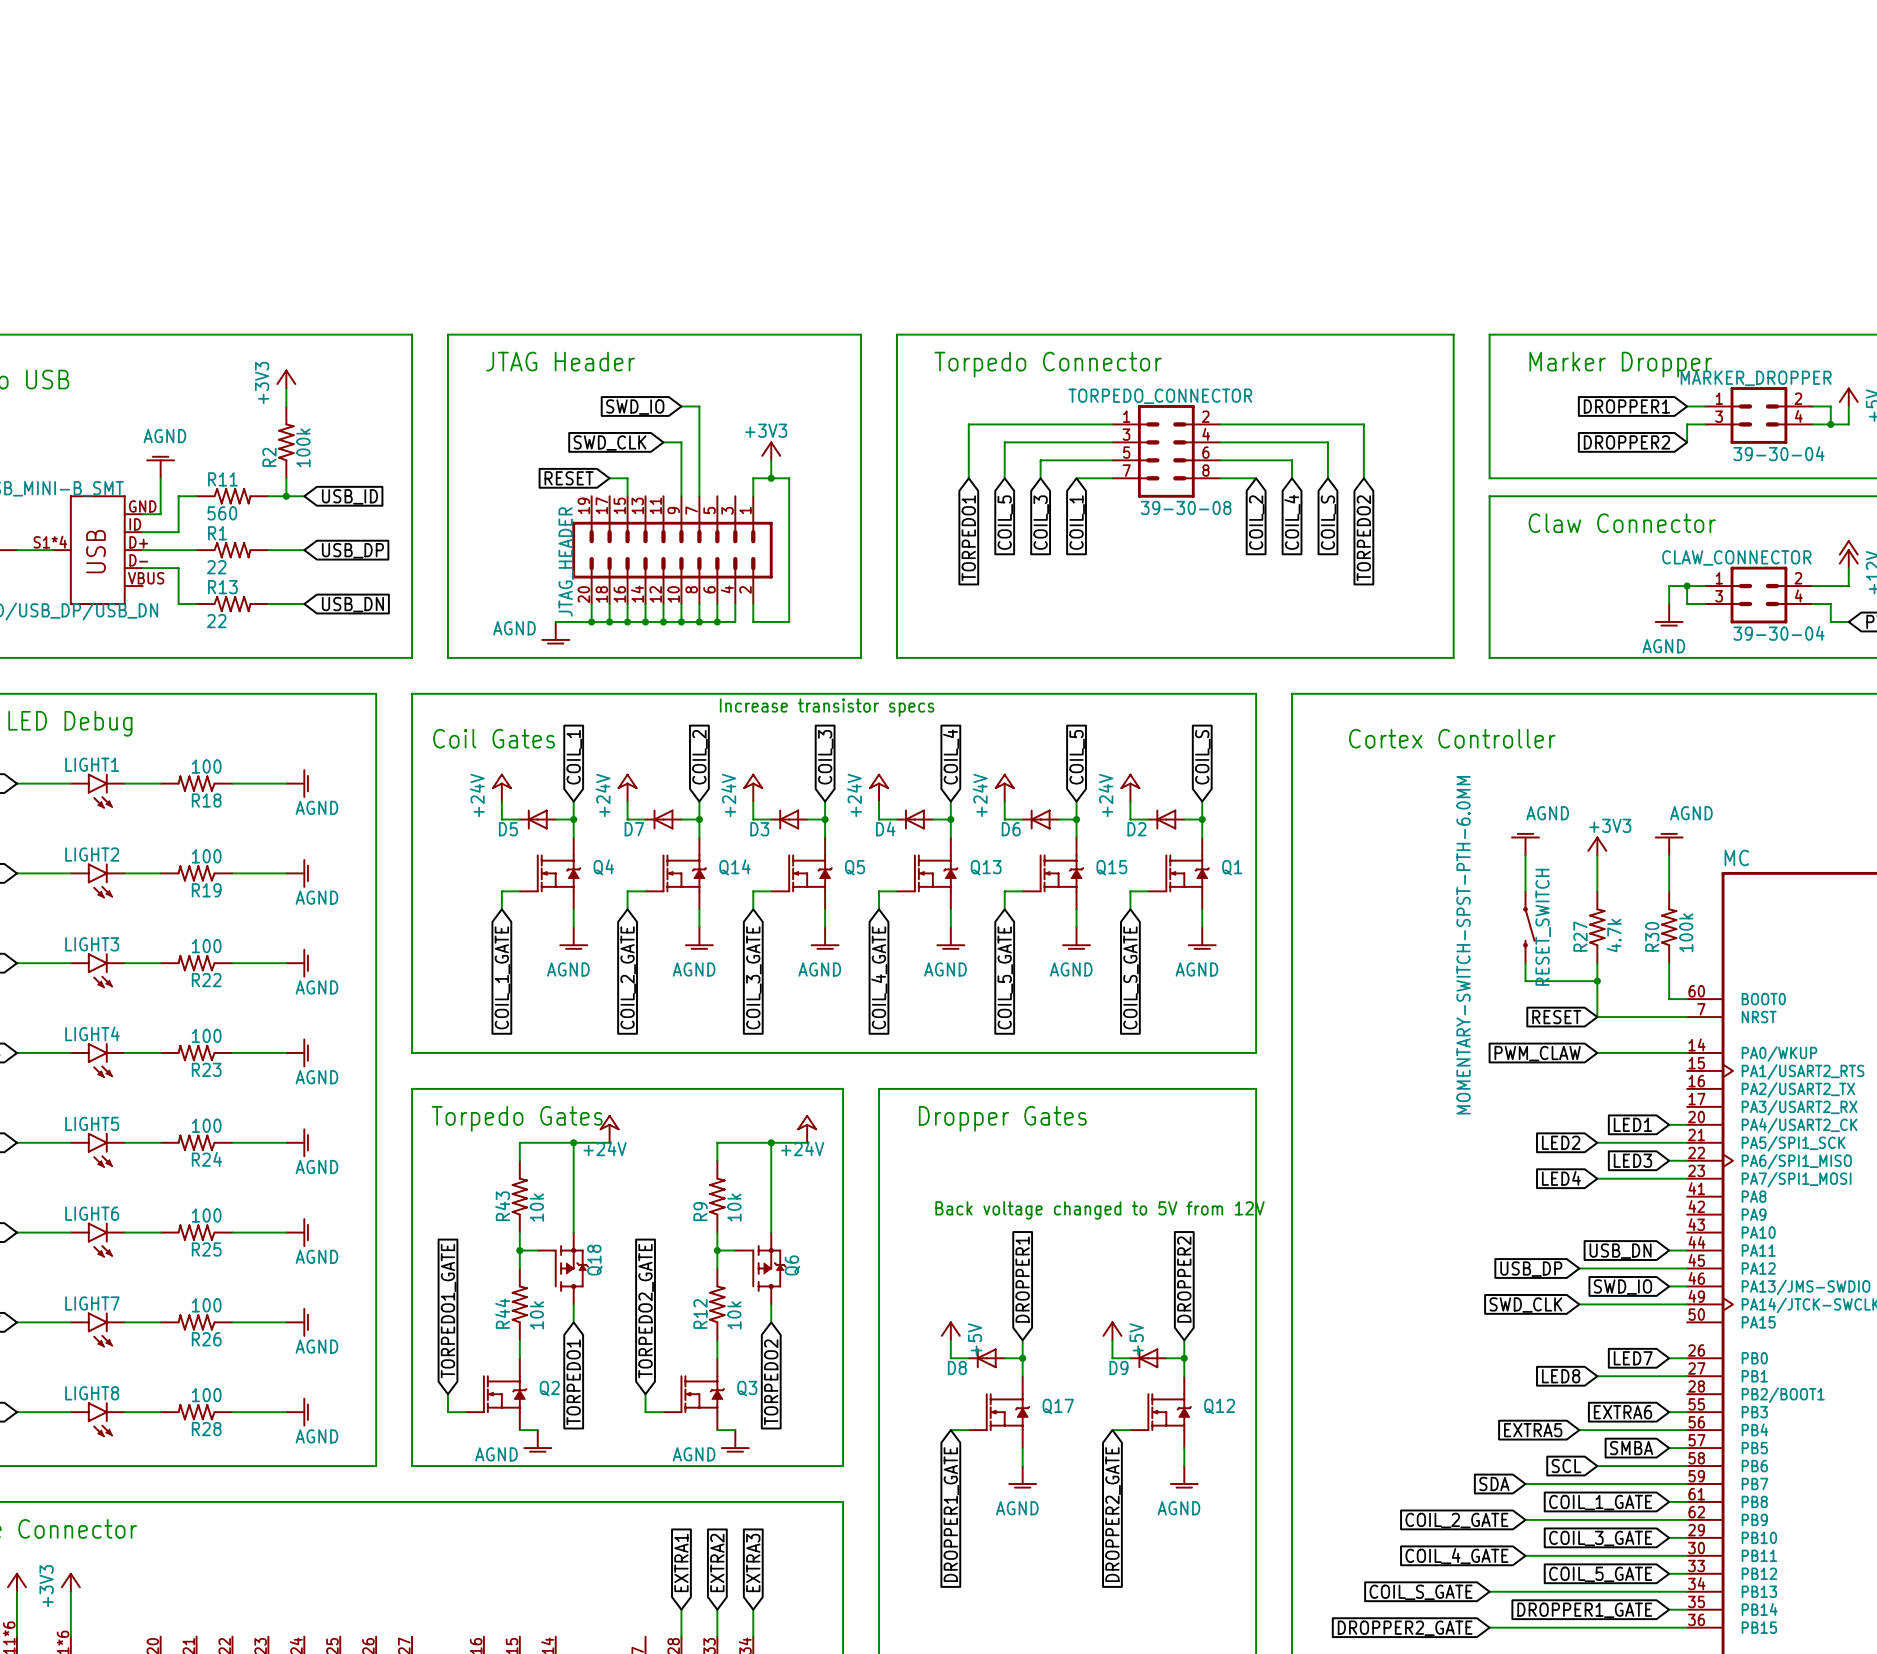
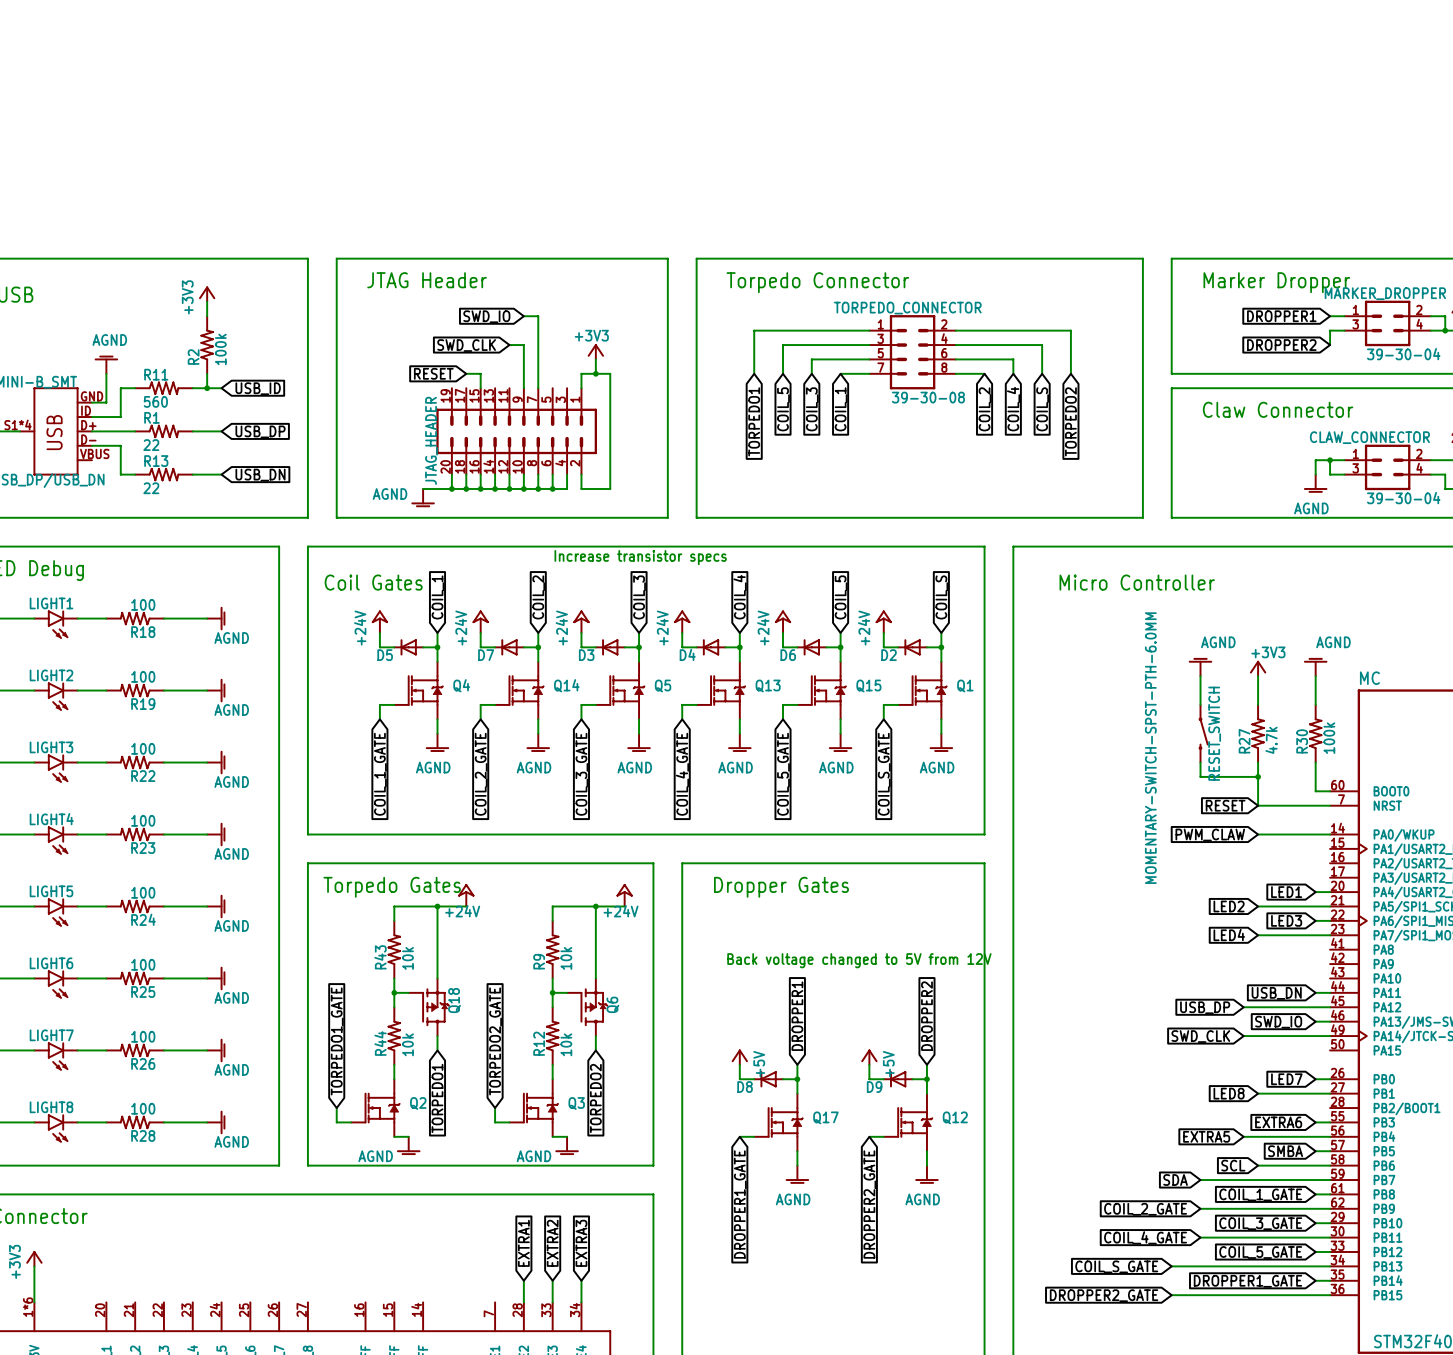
text: Cortex Controller (1452, 738) -> Micro Controller (1137, 582)

